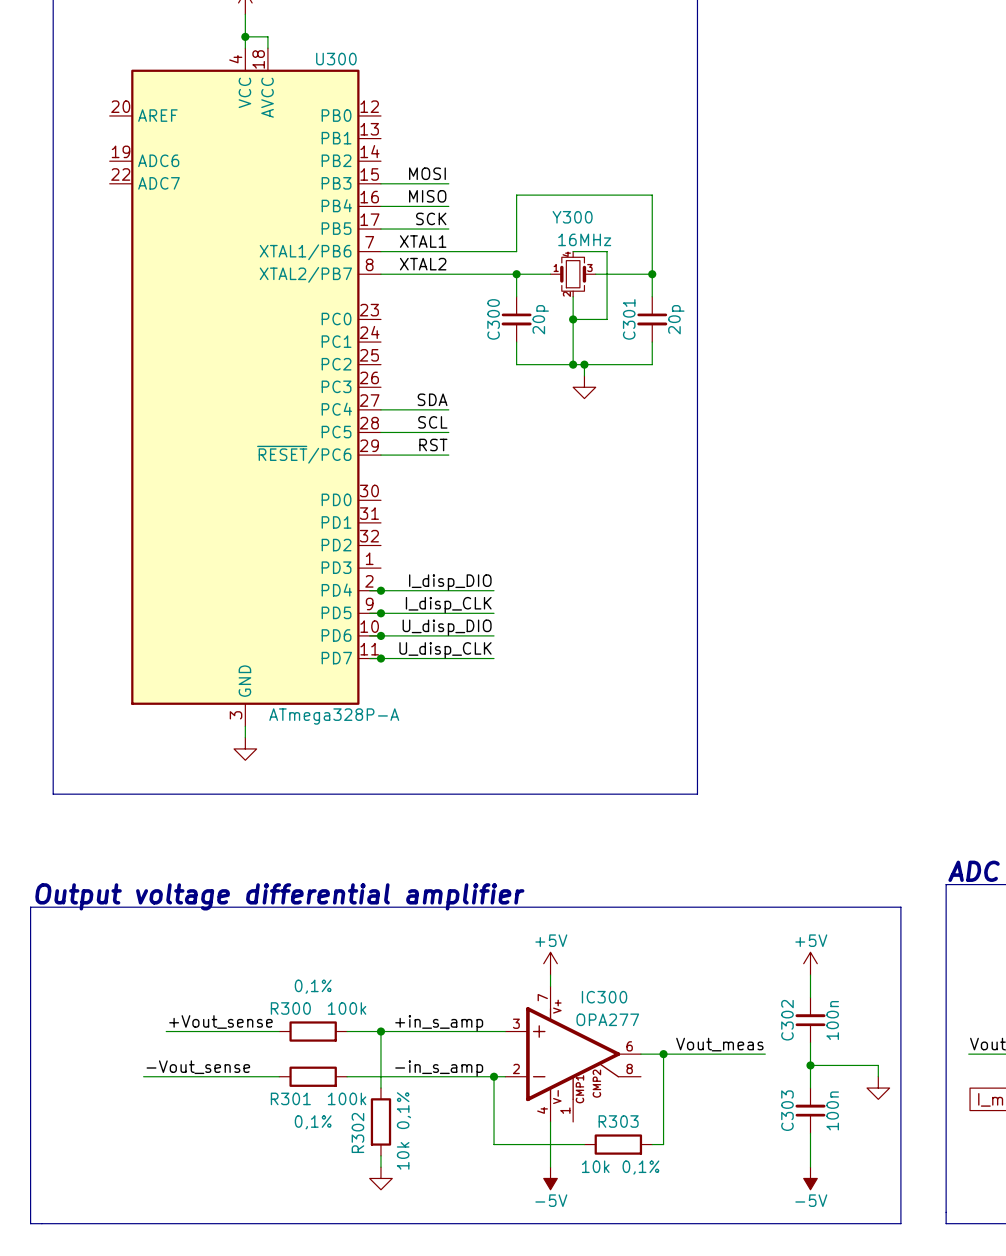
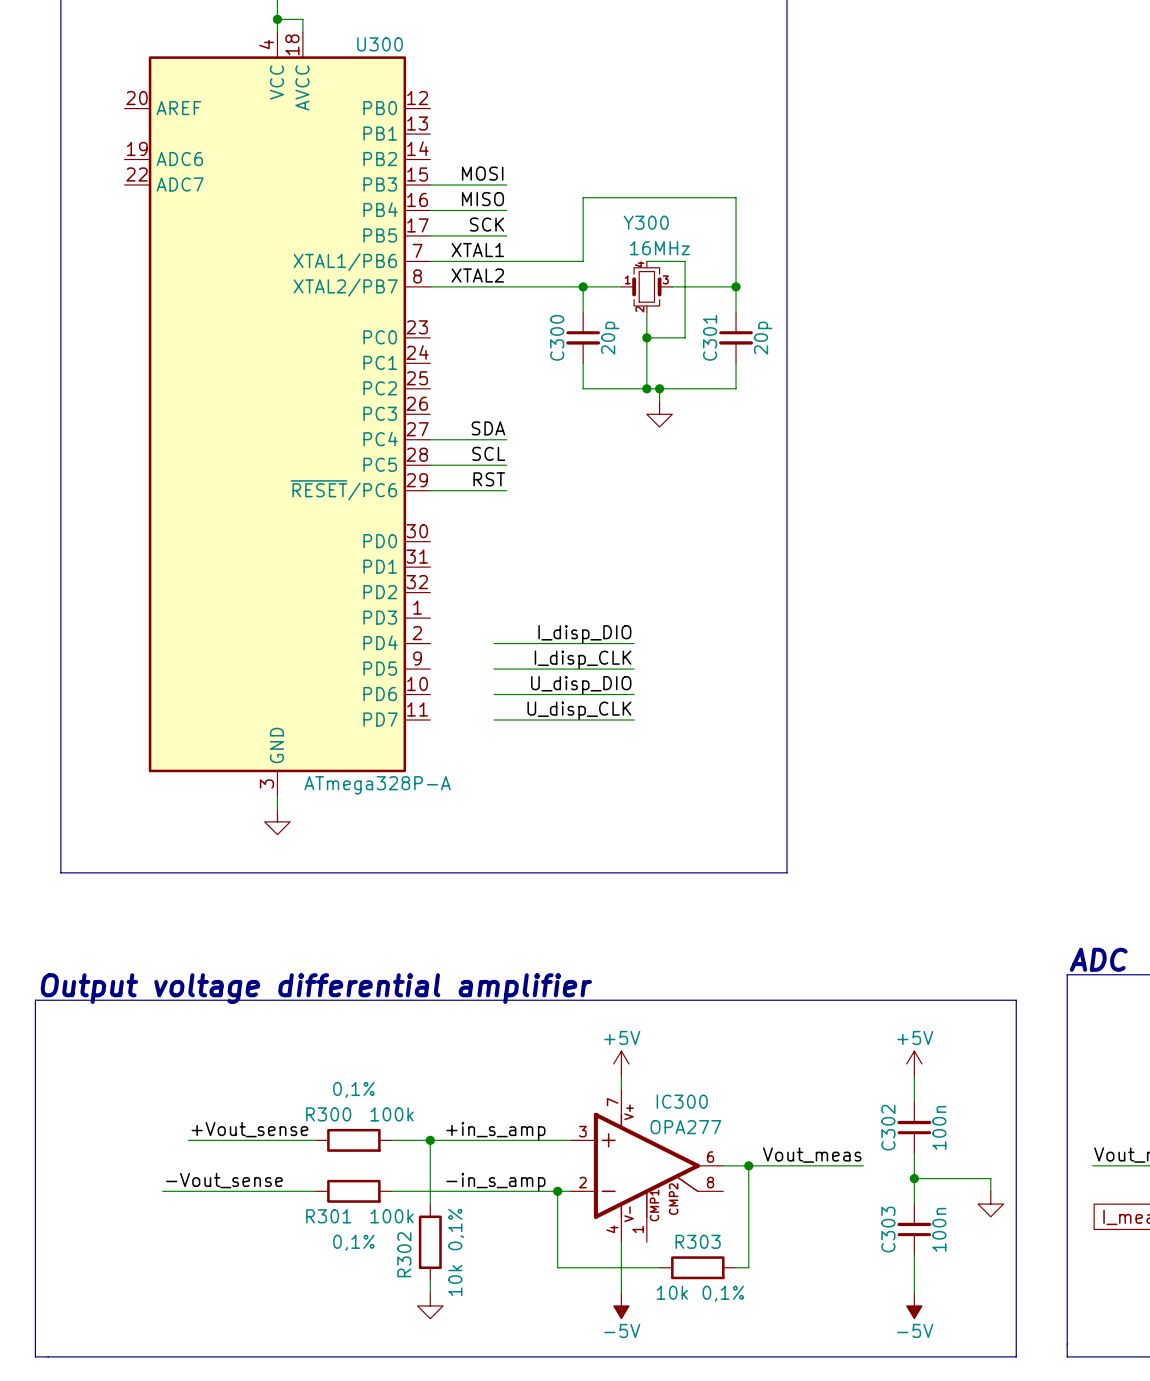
label position: I_disp_DIO (450, 582) -> I_disp_DIO (584, 634)
wire: (369, 590) (437, 590) -> (557, 643) (634, 643)
junction: (380, 590) -> none
label position: I_disp_CLK (448, 605) -> I_disp_CLK (583, 659)
wire: (369, 613) (437, 613) -> (557, 669) (634, 669)
junction: (380, 613) -> none
label position: U_disp_DIO (447, 627) -> U_disp_DIO (581, 685)
wire: (369, 635) (437, 635) -> (557, 694) (634, 694)
junction: (380, 635) -> none
label position: U_disp_CLK (445, 650) -> U_disp_CLK (579, 710)
wire: (369, 658) (437, 658) -> (557, 720) (634, 720)
junction: (380, 658) -> none

